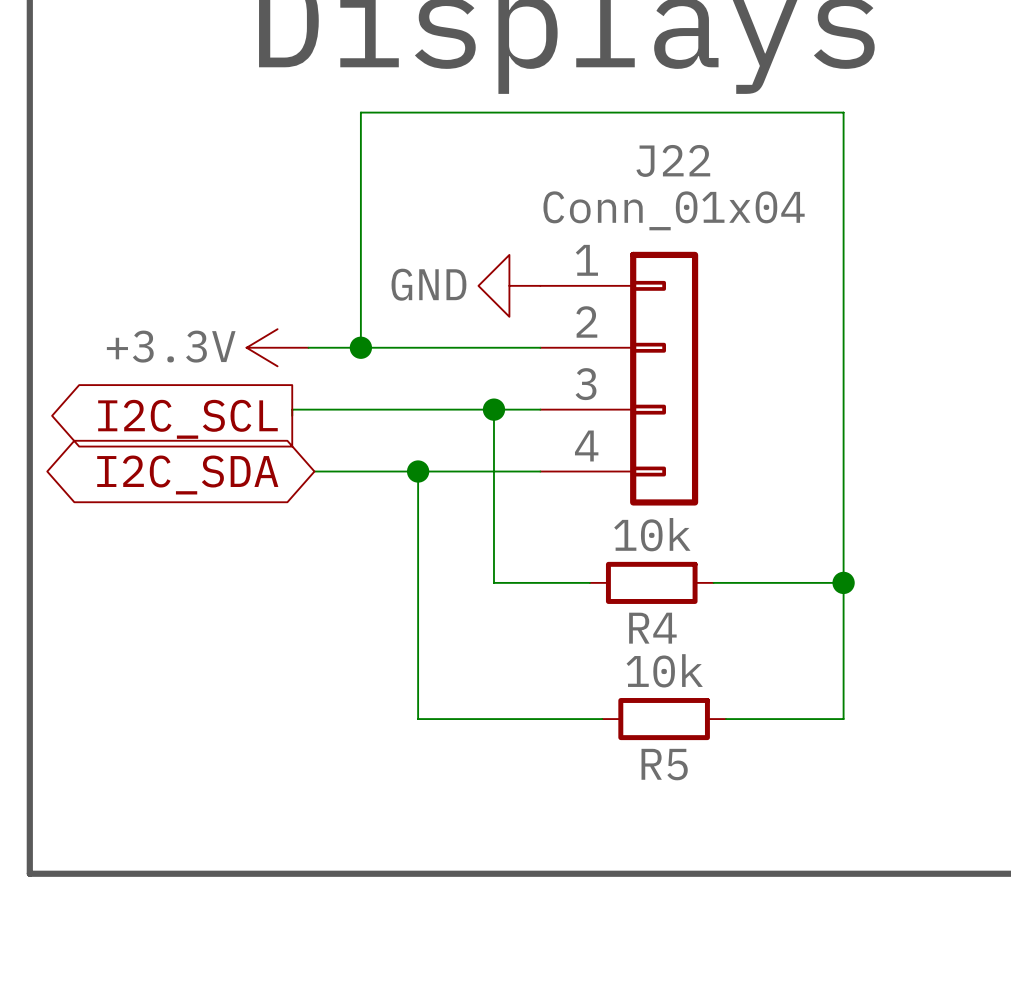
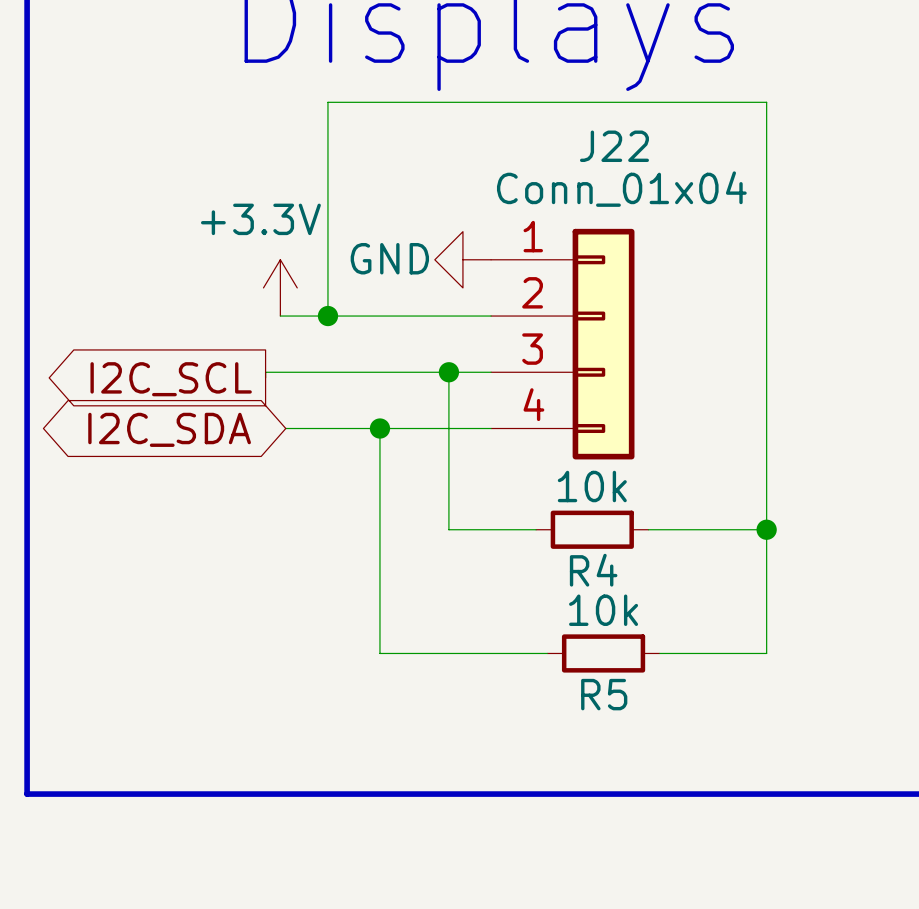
power symbol text position: +3.3V (171, 346) -> +3.3V (260, 219)
power symbol rotation: 0° (277, 347) -> 90° clockwise (280, 287)
power symbol position: +3.3V (277, 347) -> +3.3V (280, 287)

